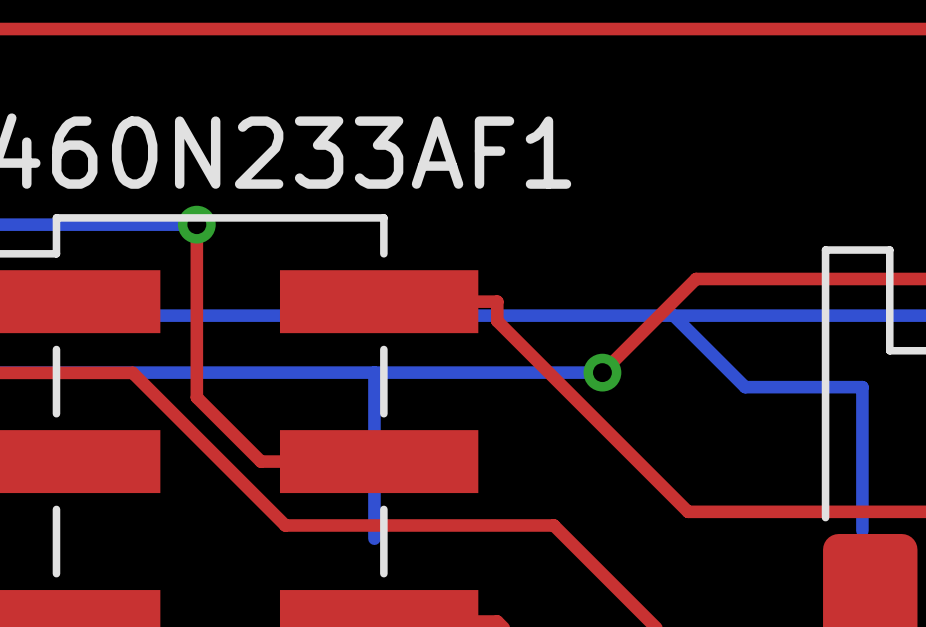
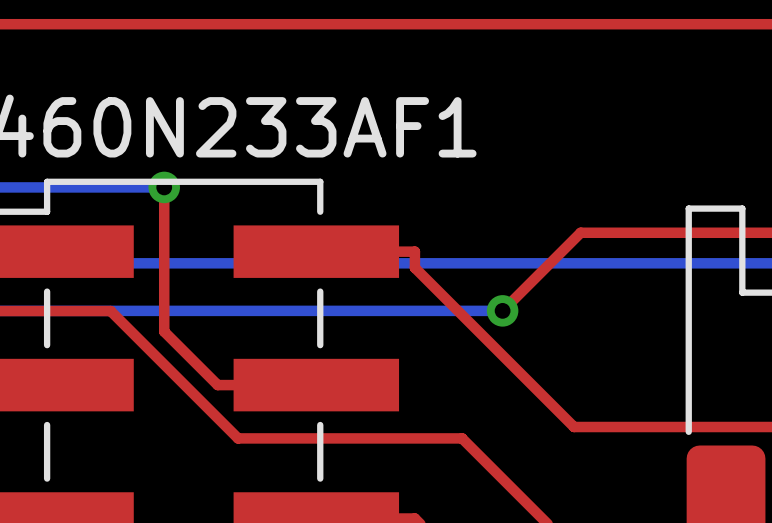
bottom track: (673, 315) (745, 387) (862, 387) (862, 530) -> none
bottom track: (374, 372) (374, 538) -> none

